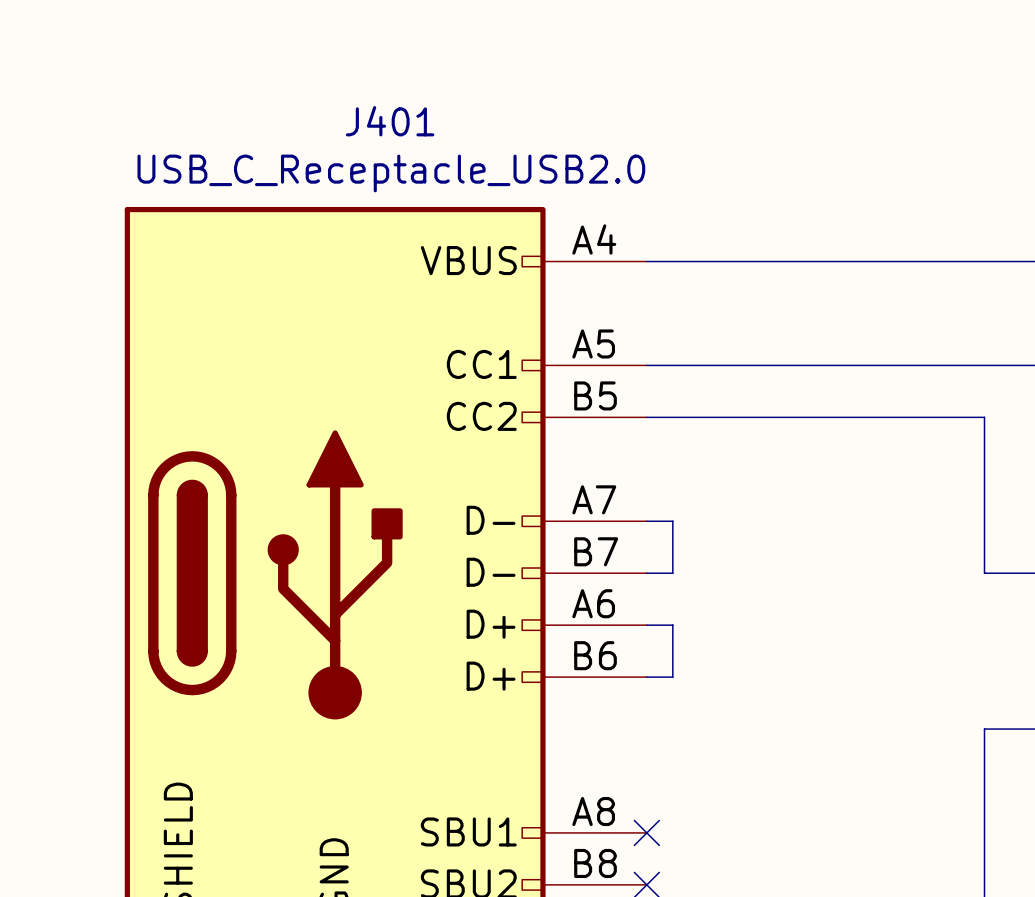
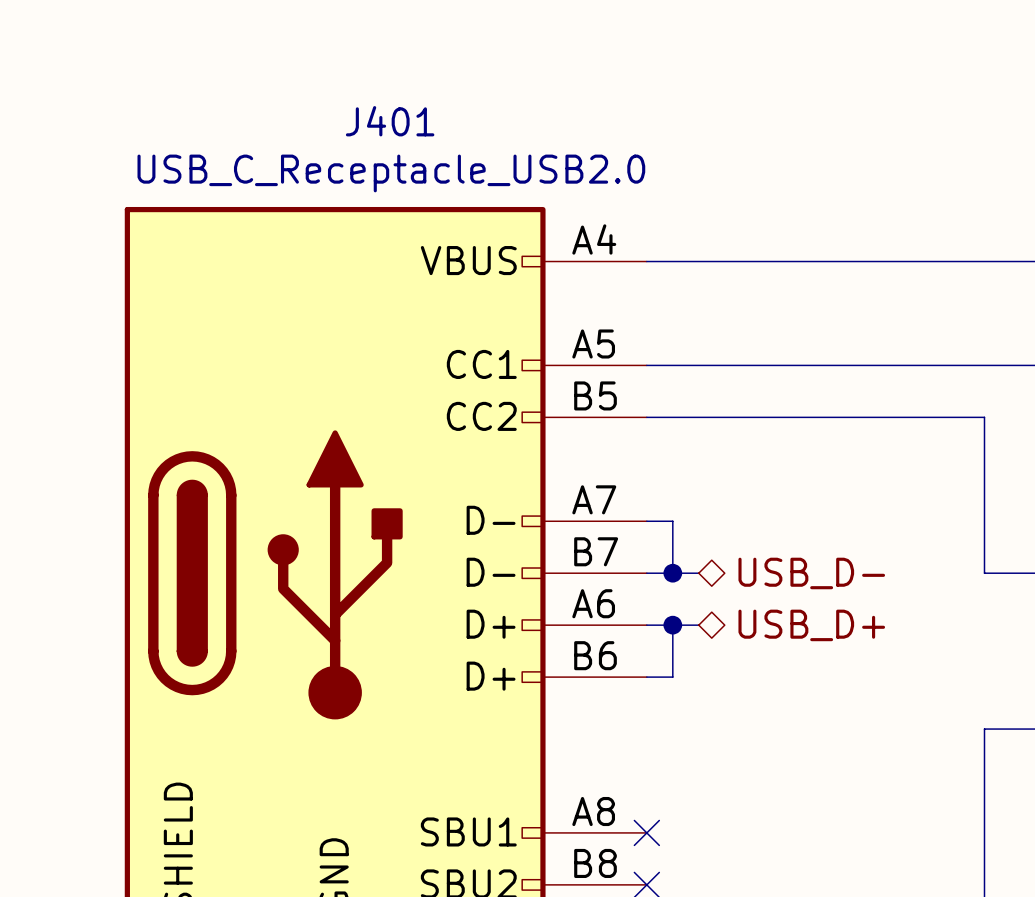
wire: none -> (672, 573) (698, 573)
junction: none -> (672, 573)
hierarchical label: none -> USB_D- (811, 573)
wire: none -> (672, 625) (698, 625)
junction: none -> (672, 625)
hierarchical label: none -> USB_D+ (811, 625)

